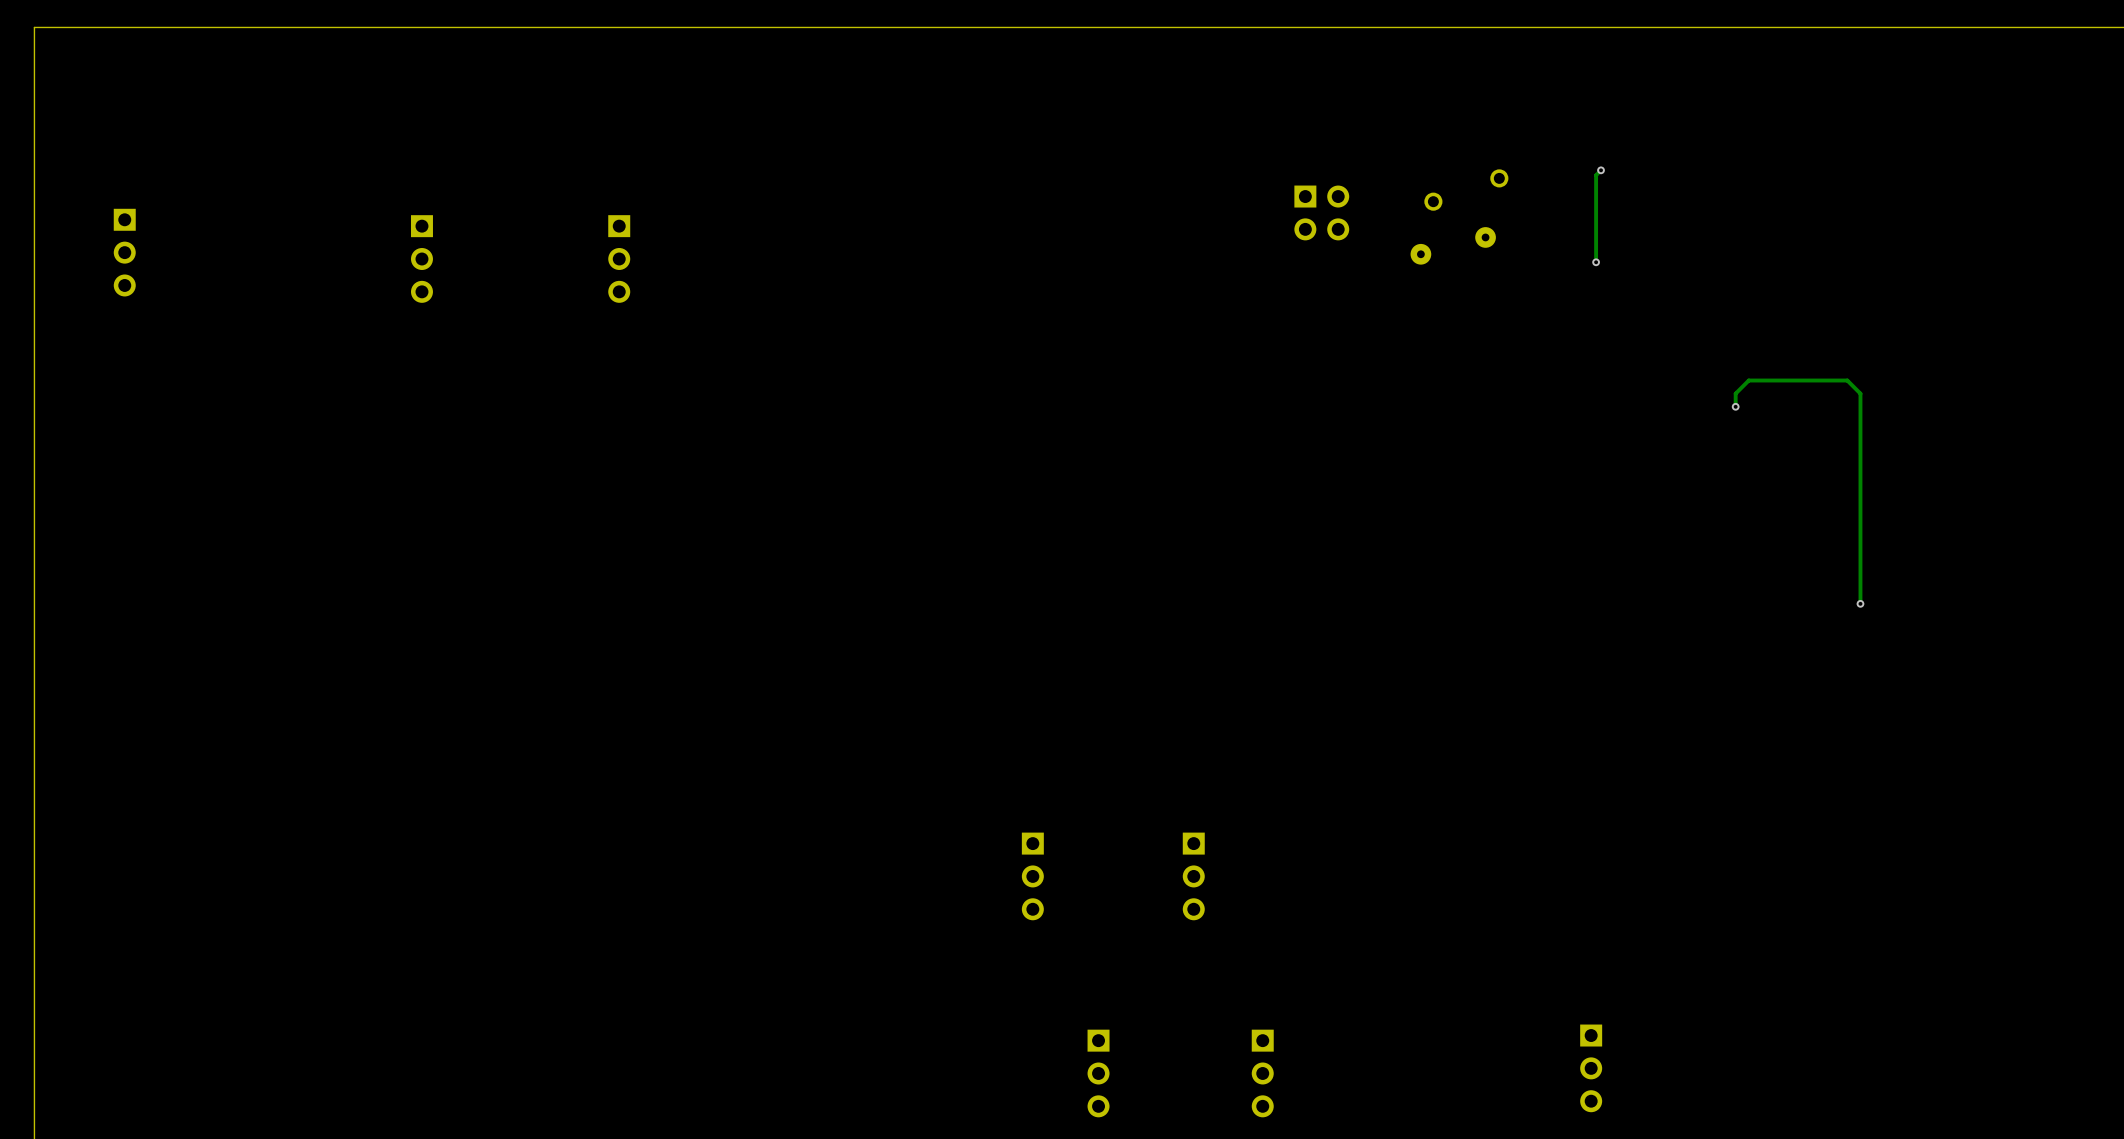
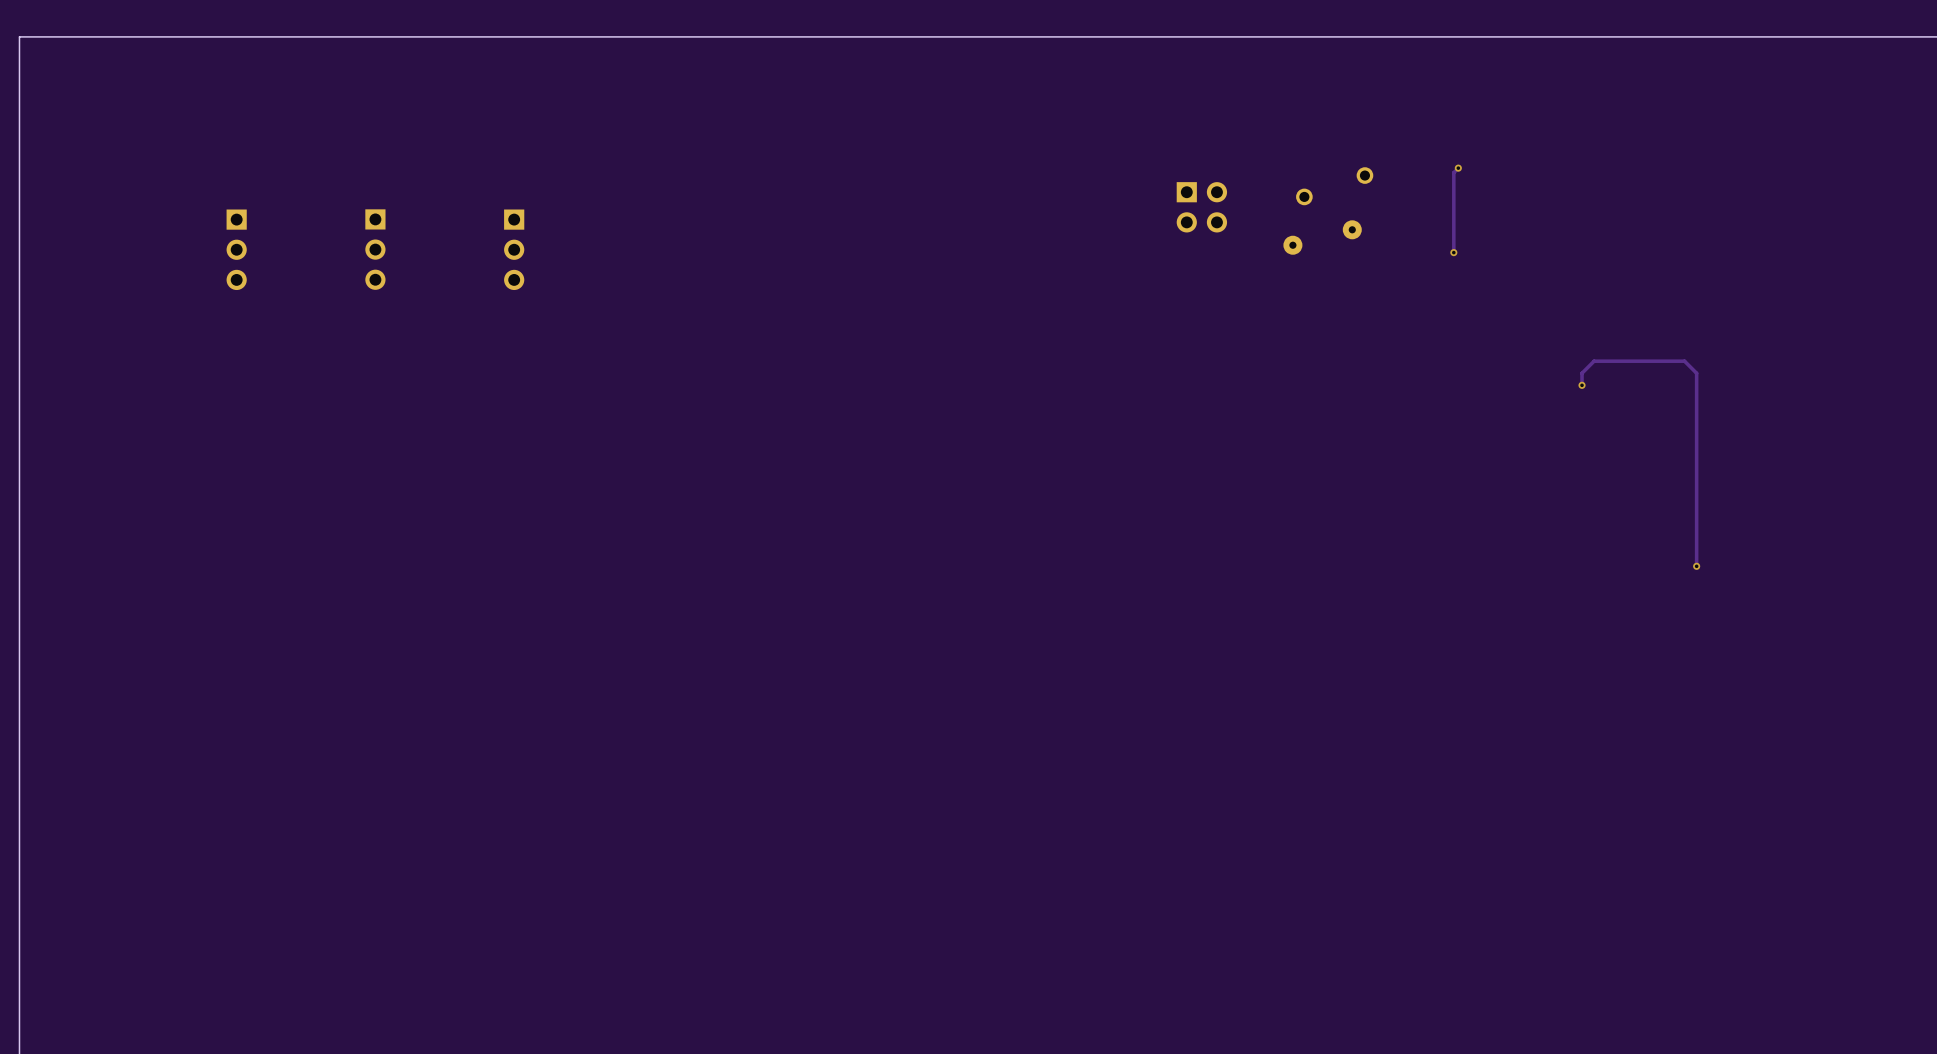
part position: (124, 252) -> (236, 249)
part position: (619, 258) -> (514, 249)
part: (1032, 876) -> none
part: (1193, 876) -> none
part: (1591, 1068) -> none
part: (1098, 1073) -> none
part: (1262, 1073) -> none

